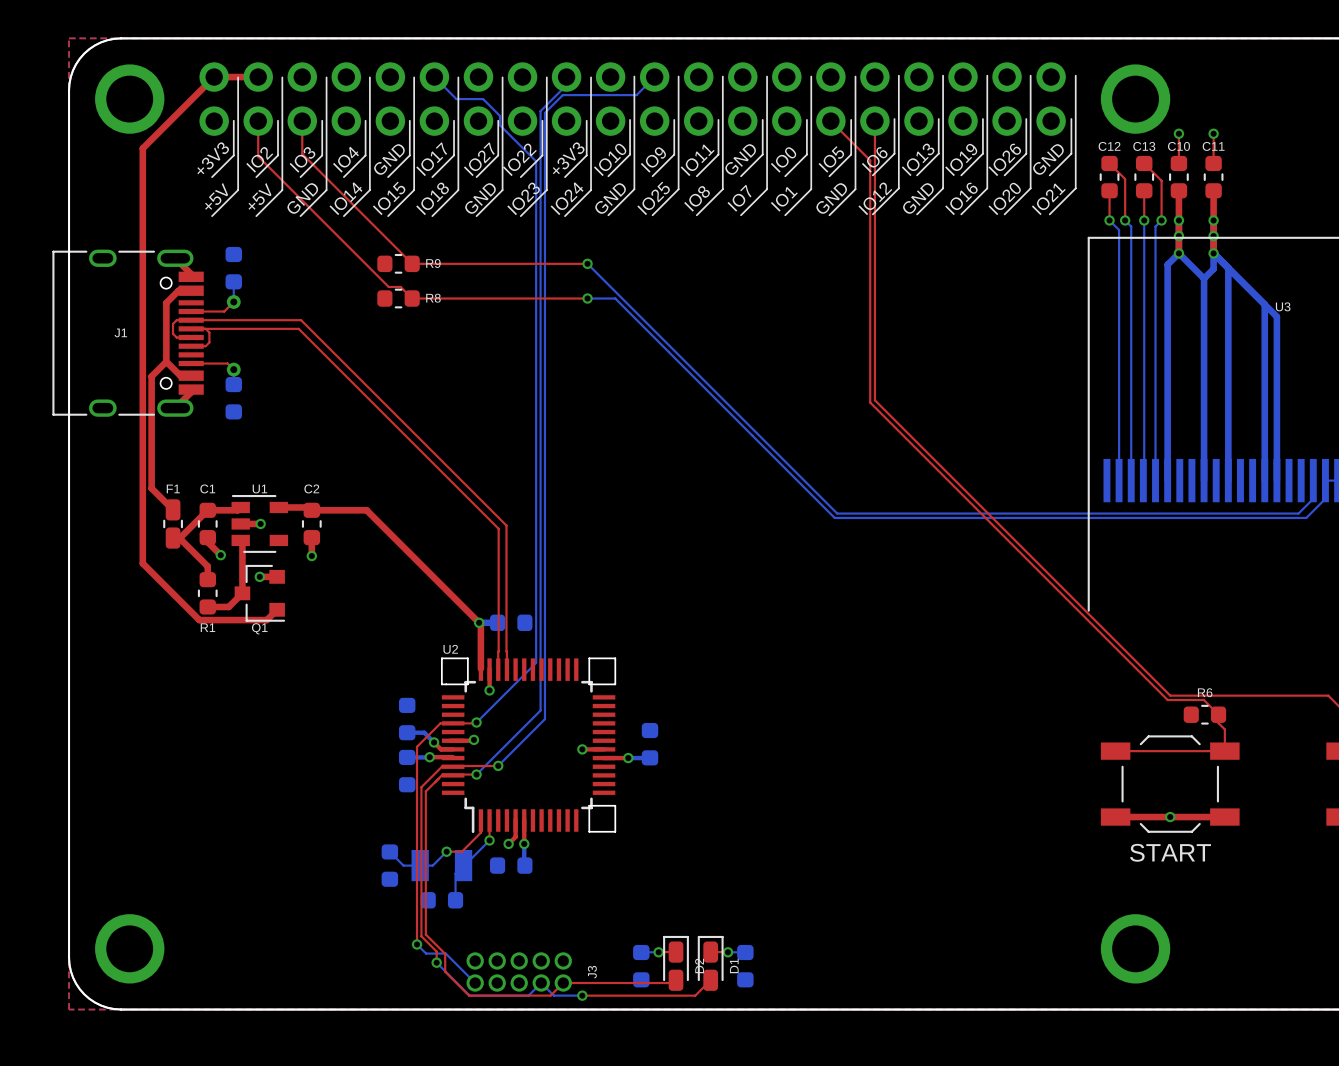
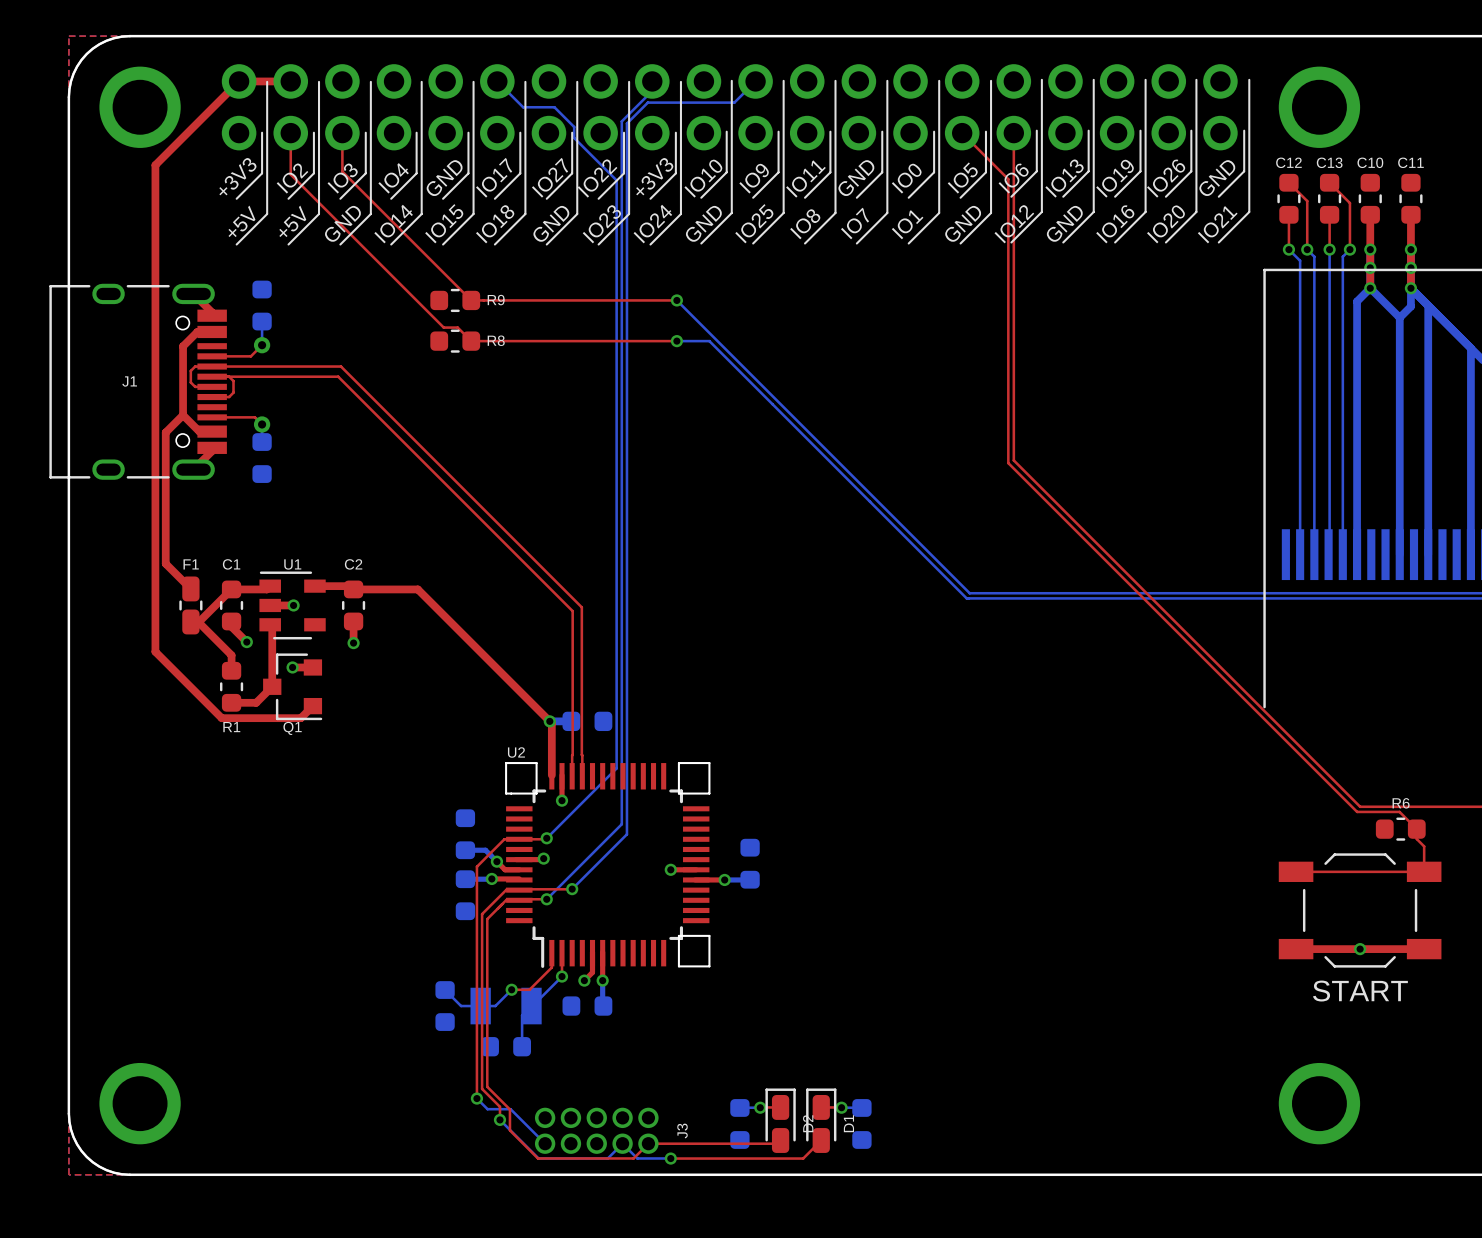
top track: (1178, 133) (1178, 163) -> none
via: (1178, 133) -> none
top track: (1213, 133) (1213, 163) -> none
via: (1213, 133) -> none

